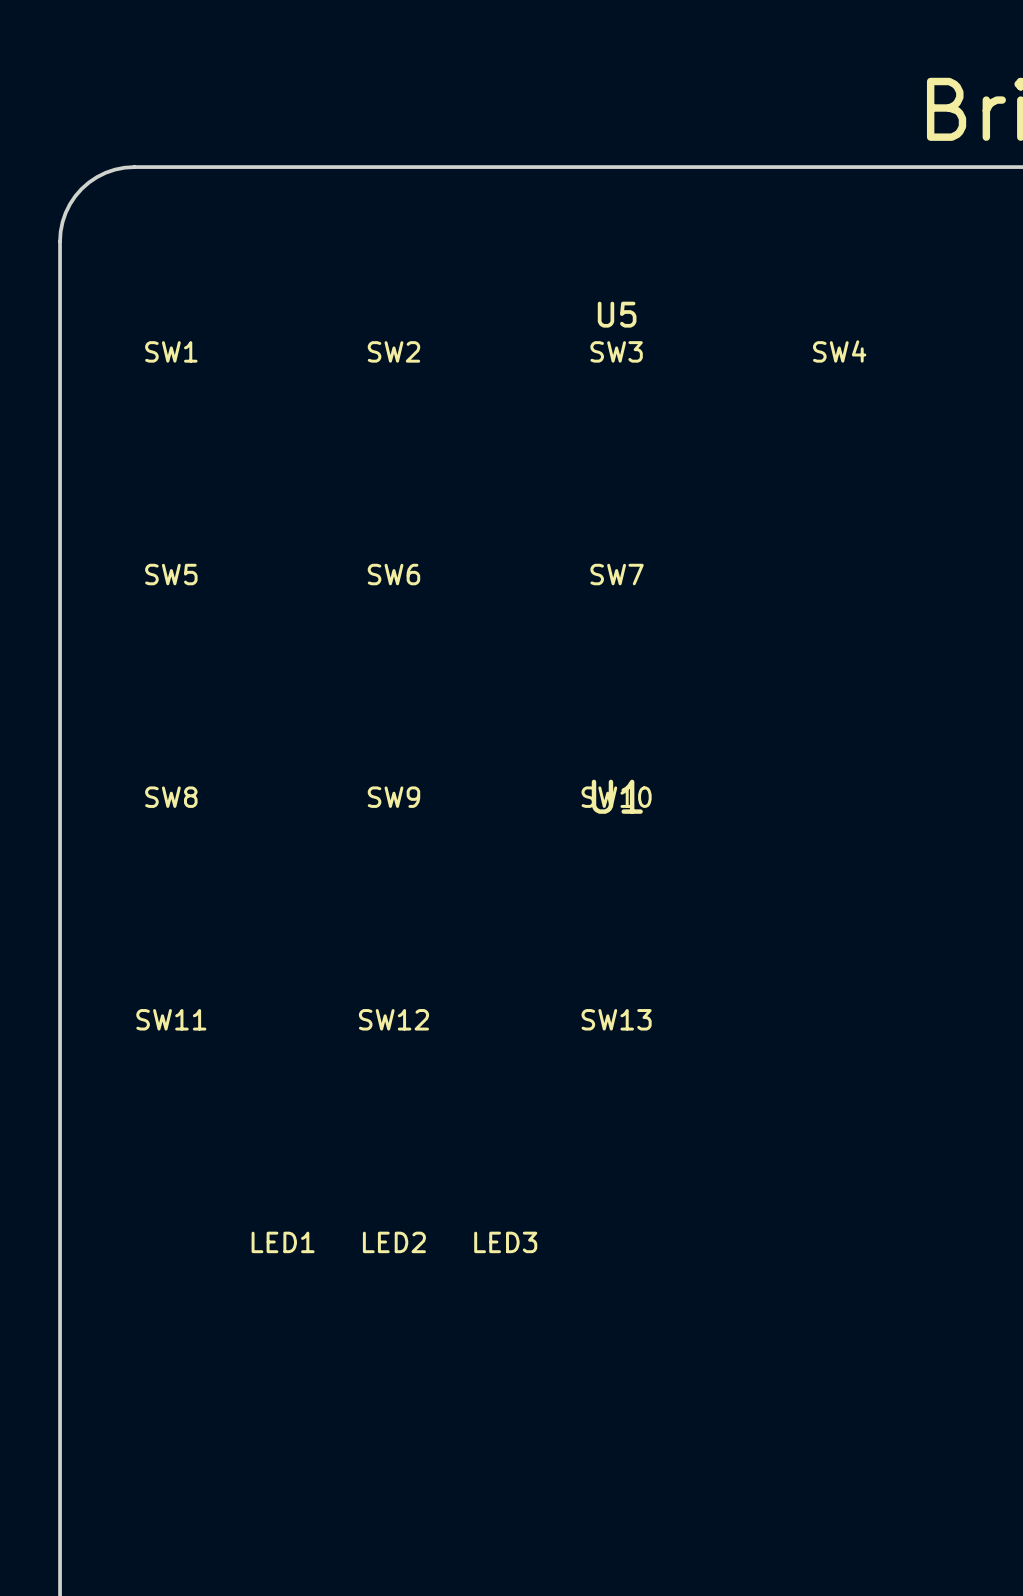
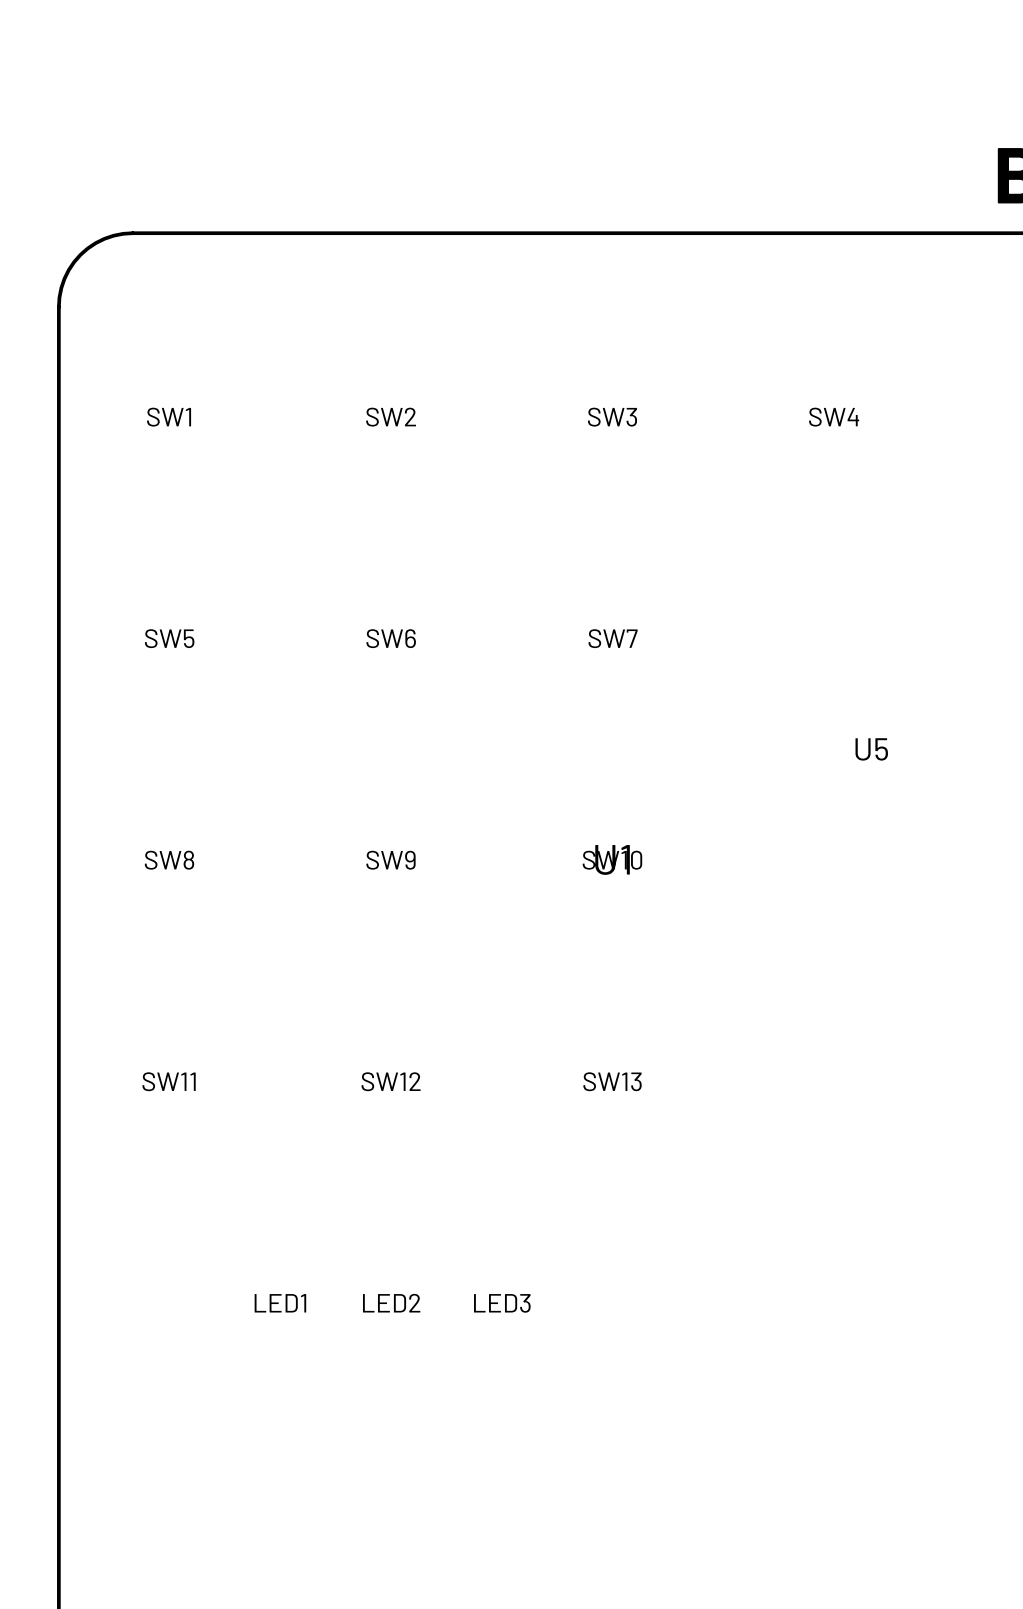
U5 position: (617, 314) -> (871, 749)

